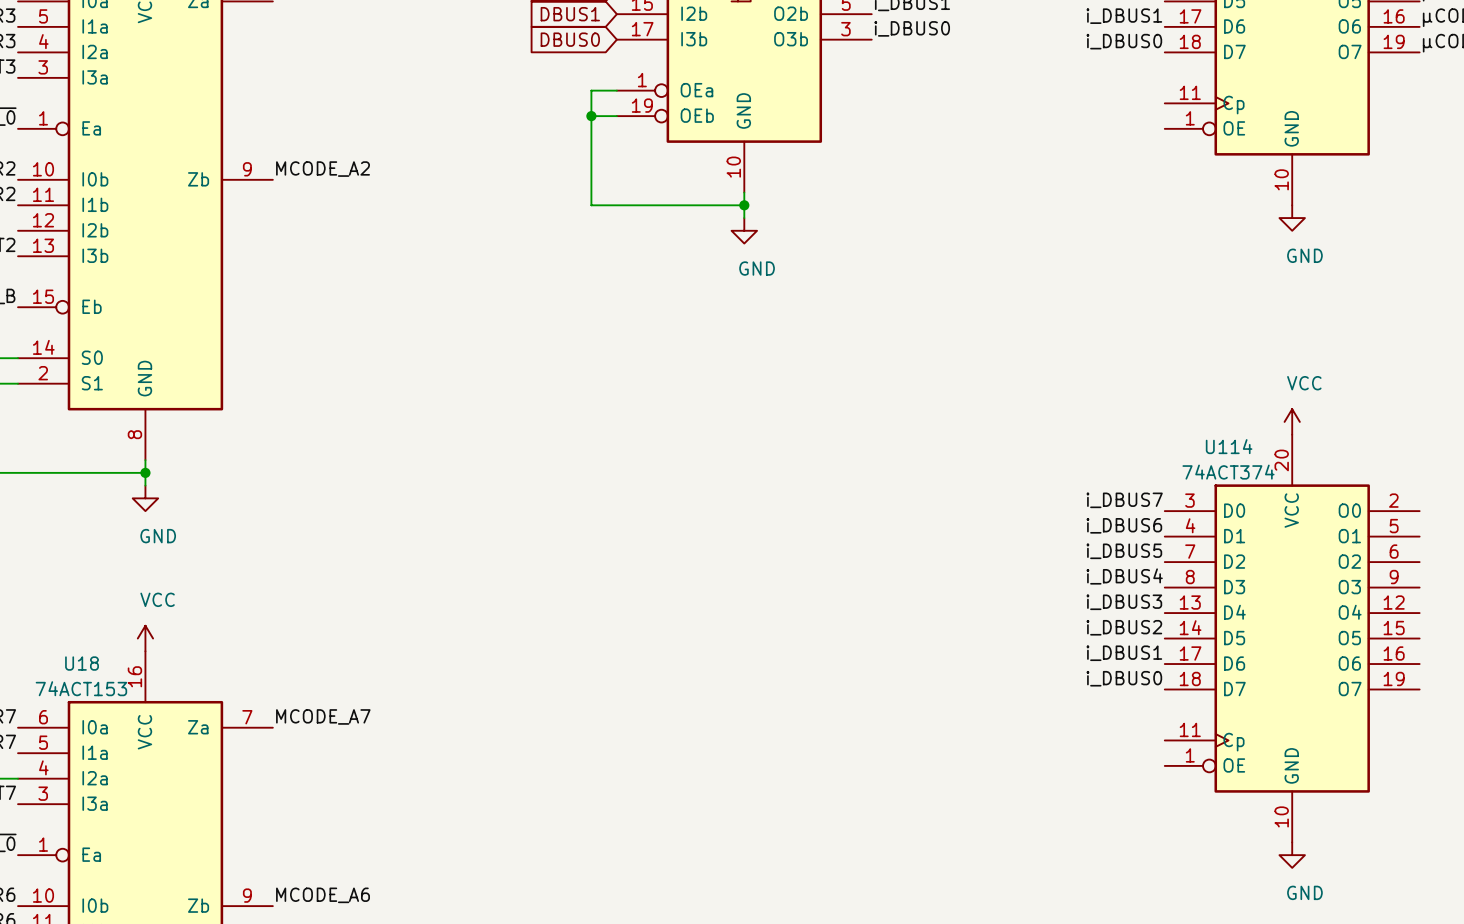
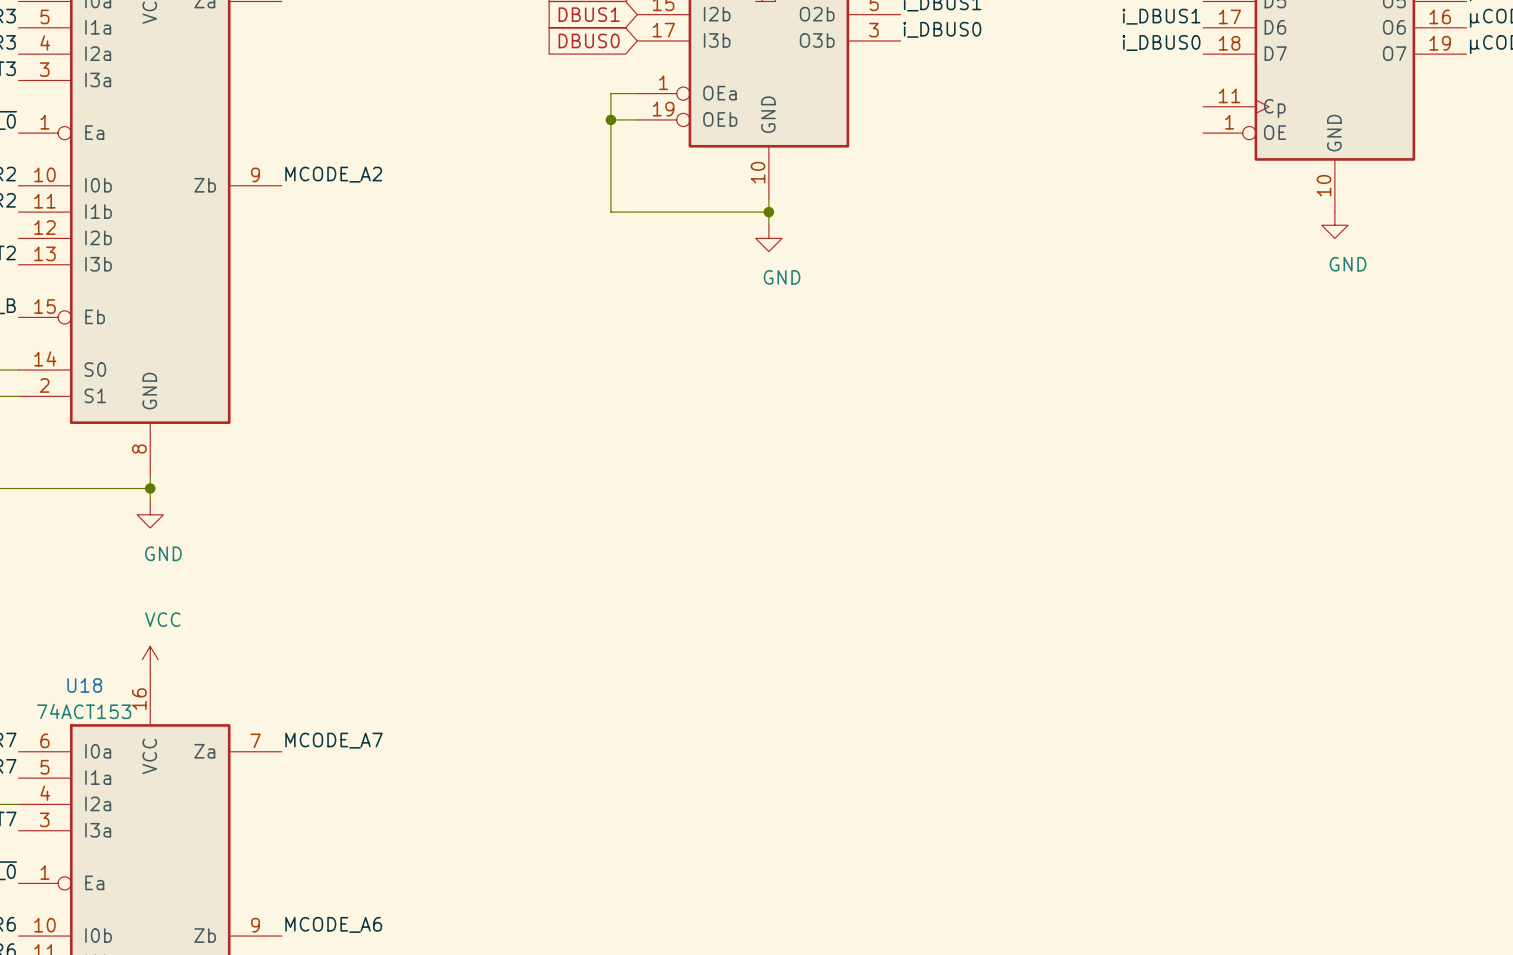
power symbol: VCC (1292, 421) -> none
label: i_DBUS7 (1124, 500) -> none
label: i_DBUS6 (1124, 525) -> none
label: i_DBUS5 (1124, 551) -> none
label: i_DBUS4 (1124, 576) -> none
label: i_DBUS3 (1124, 602) -> none
label: i_DBUS2 (1124, 627) -> none
U114: 74ACT374 (1292, 638) -> none
label: i_DBUS1 (1124, 653) -> none
label: i_DBUS0 (1124, 678) -> none
power symbol: GND (1292, 855) -> none

